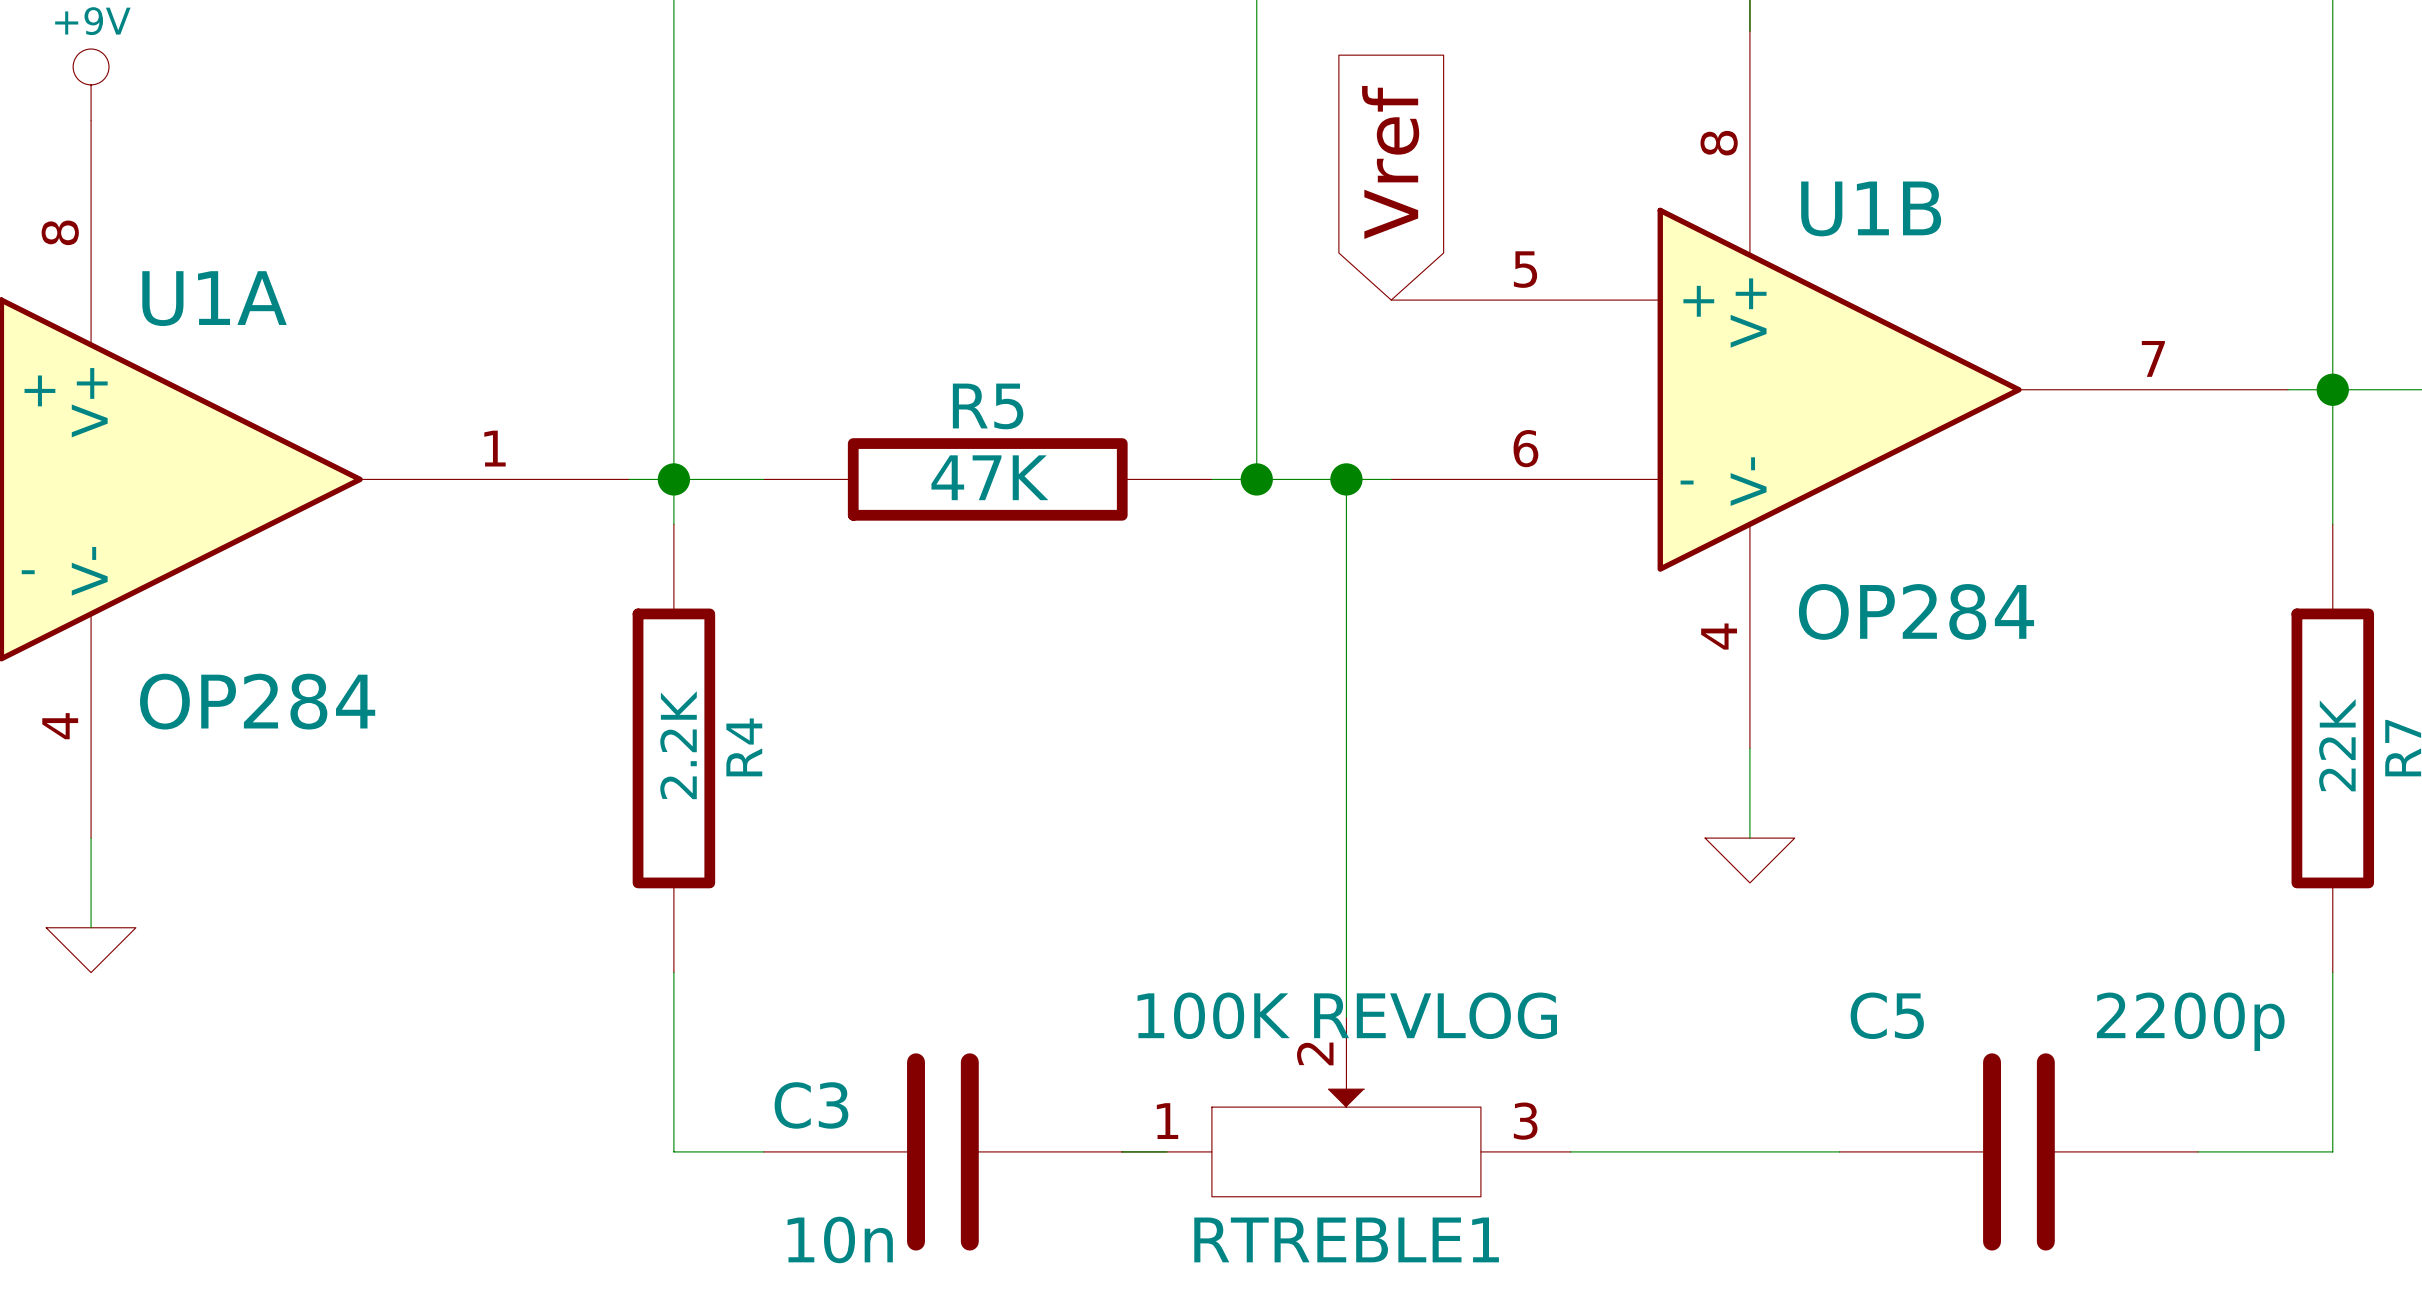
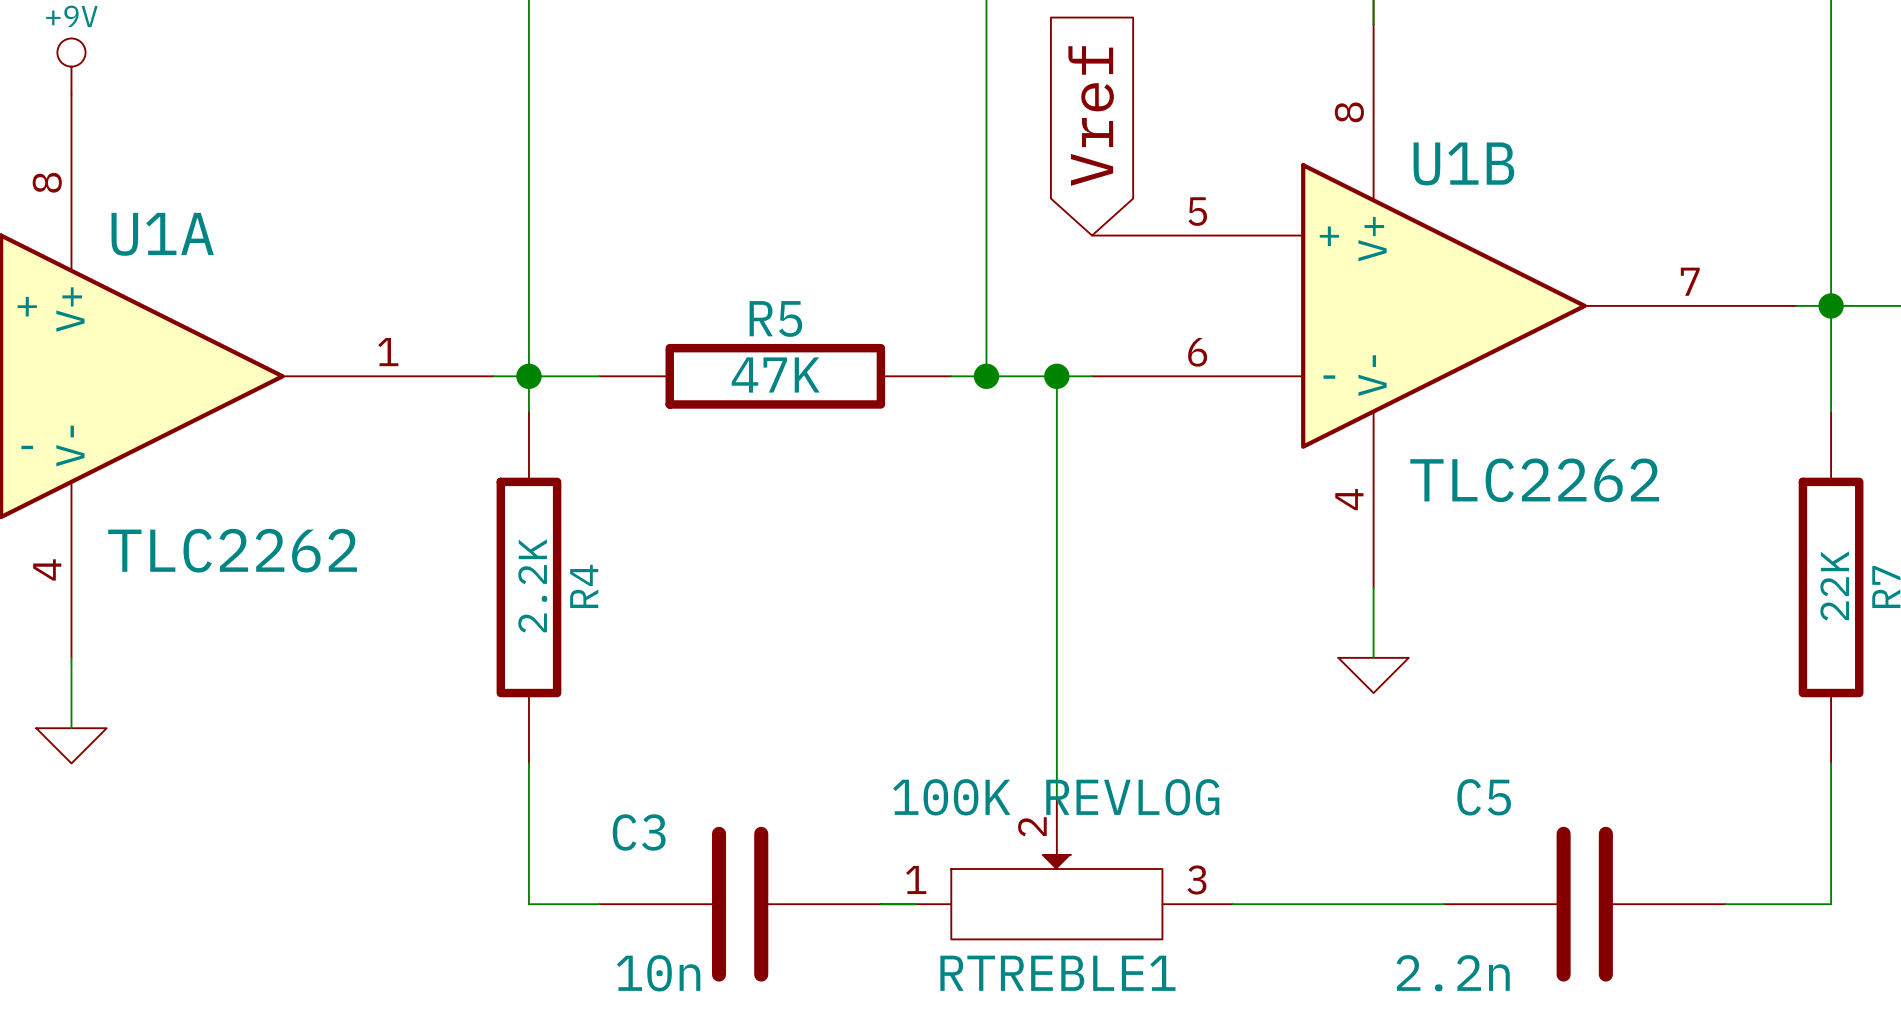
U1B value: OP284 (1916, 611) -> TLC2262 (1534, 480)
U1A value: OP284 (257, 701) -> TLC2262 (232, 550)
C5 value: 2200p (2190, 1021) -> 2.2n (1453, 973)
C3 name position: C3 (811, 1105) -> C3 (639, 832)

